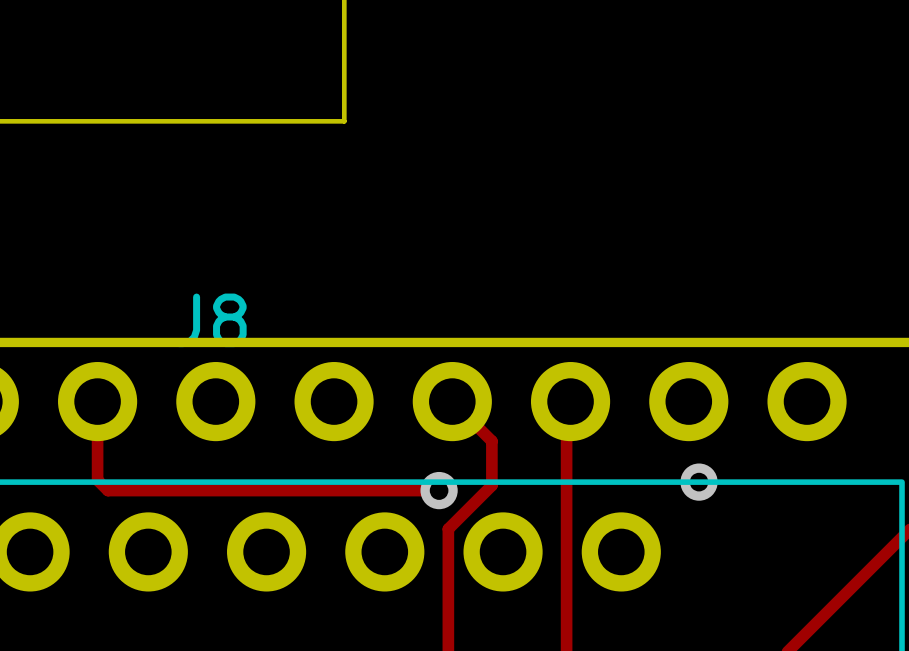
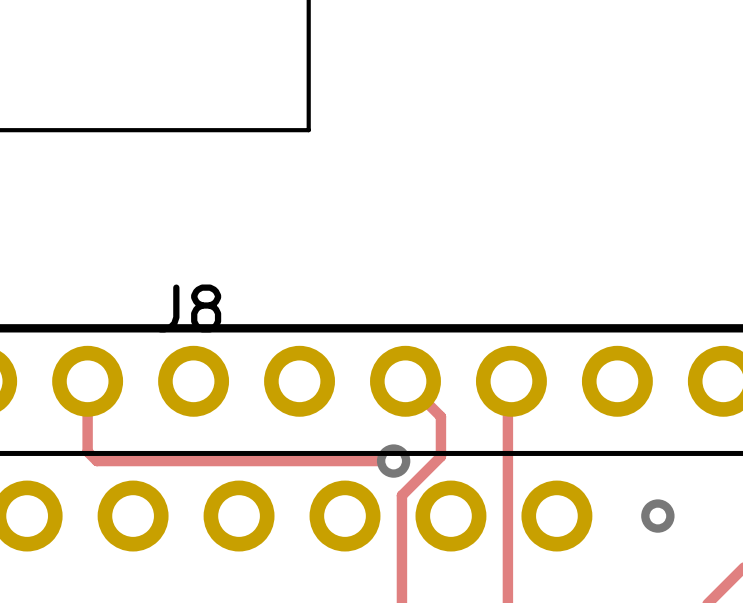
via position: (699, 482) -> (657, 516)

